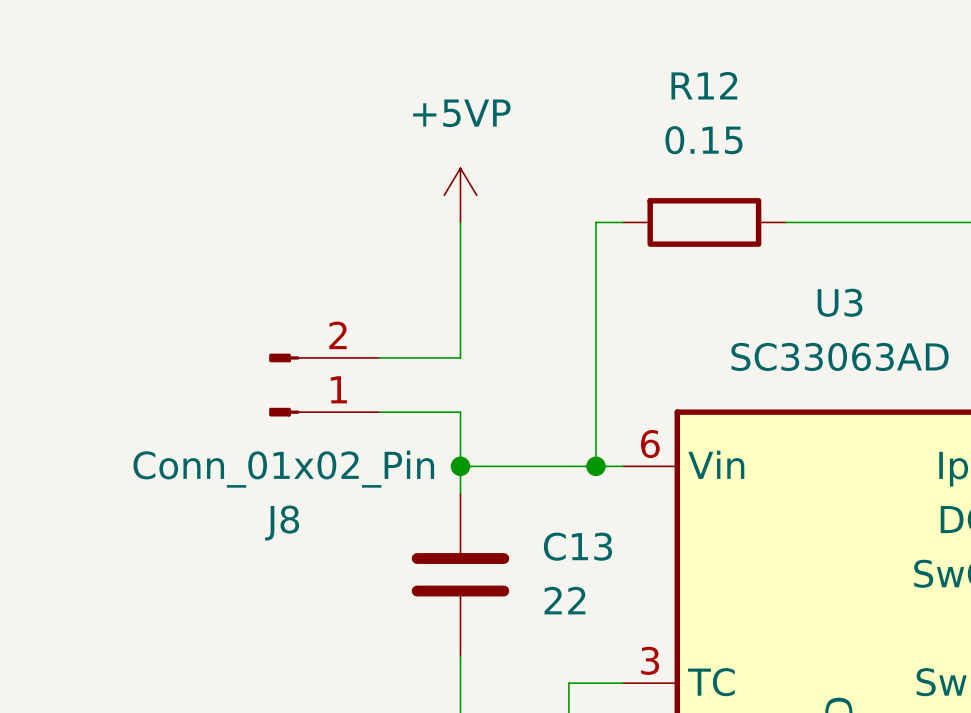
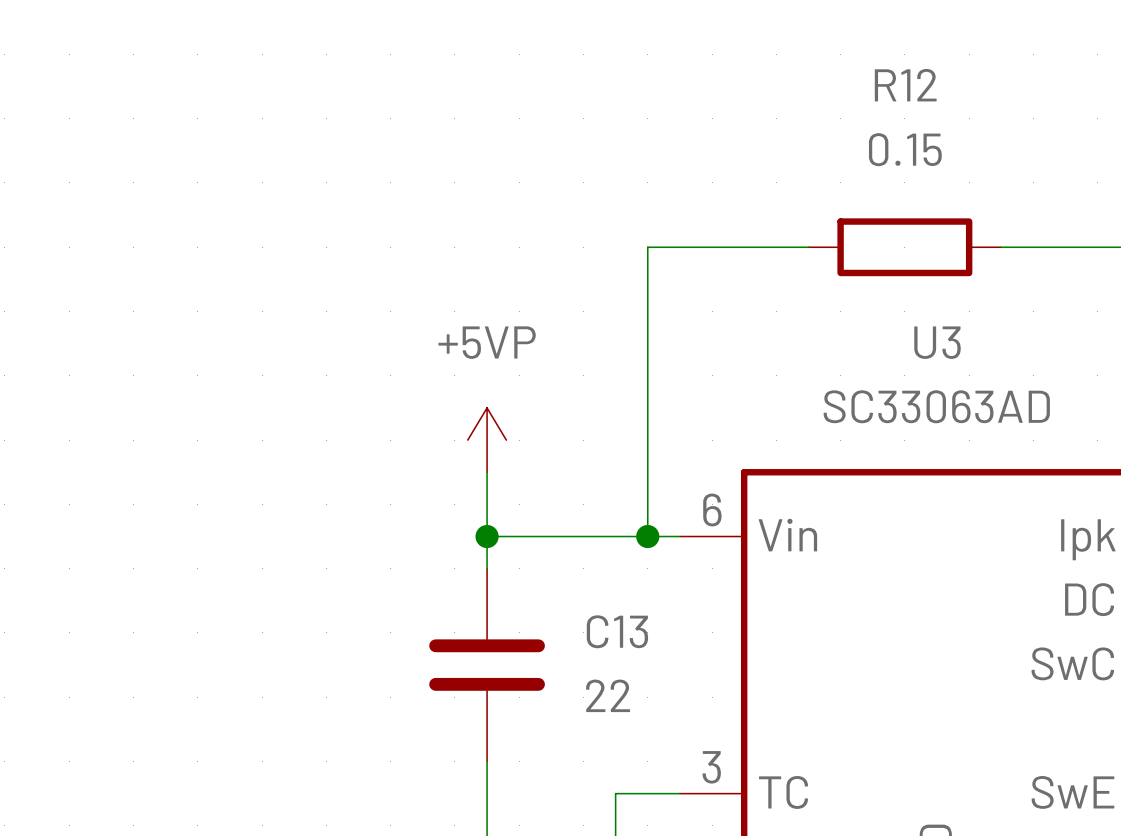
power symbol position: +5VP (460, 195) -> +5VP (487, 440)
wire: (460, 222) (460, 357) (379, 357) -> none
R12 position: (704, 222) -> (904, 247)
wire: (785, 222) (894, 222) -> (679, 247) (808, 247)
J8: Conn_01x02_Pin (324, 385) -> none
wire: (379, 412) (460, 412) -> none

